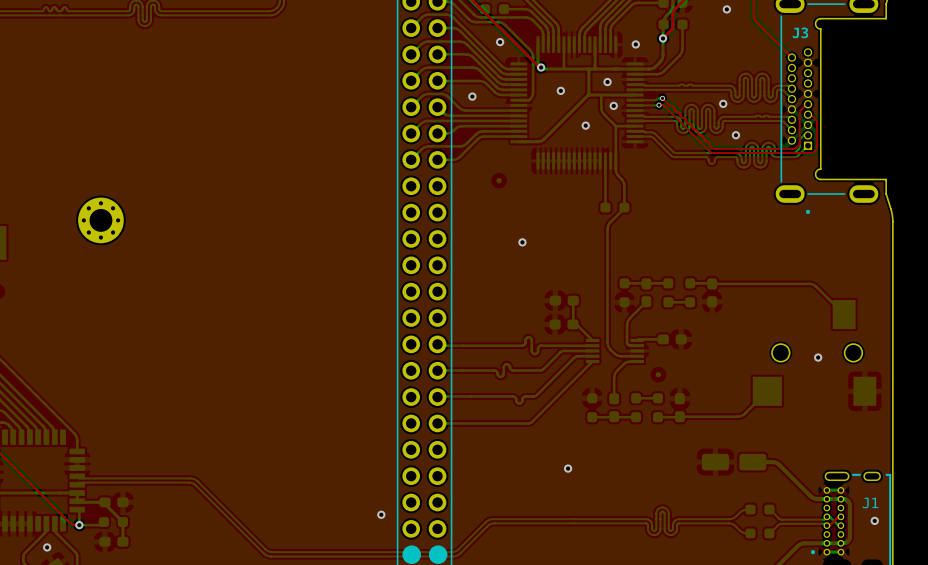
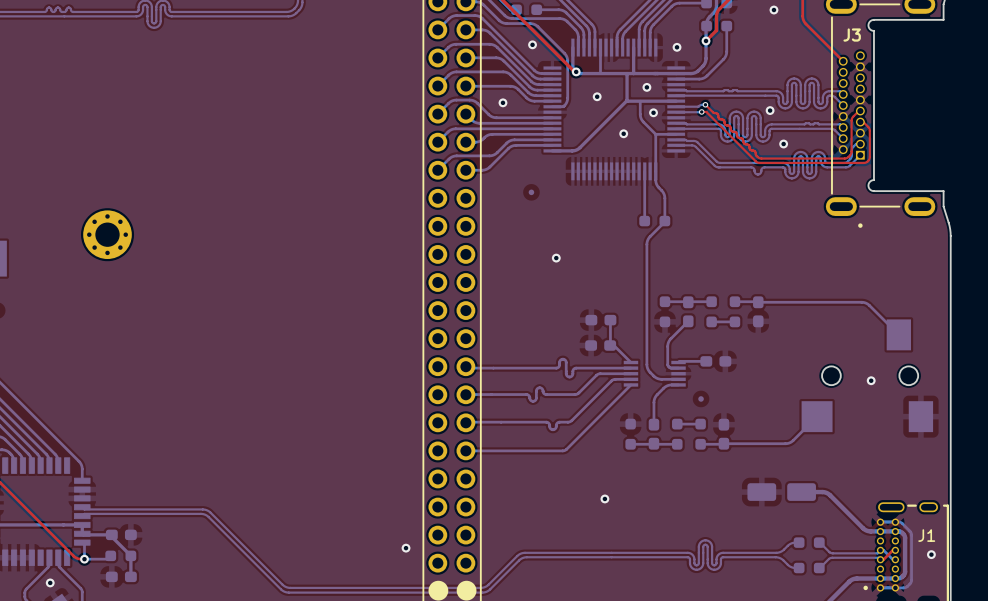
bottom track: none -> (895, 522) (901, 523) (911, 535) (911, 581) (905, 587) (895, 587)

